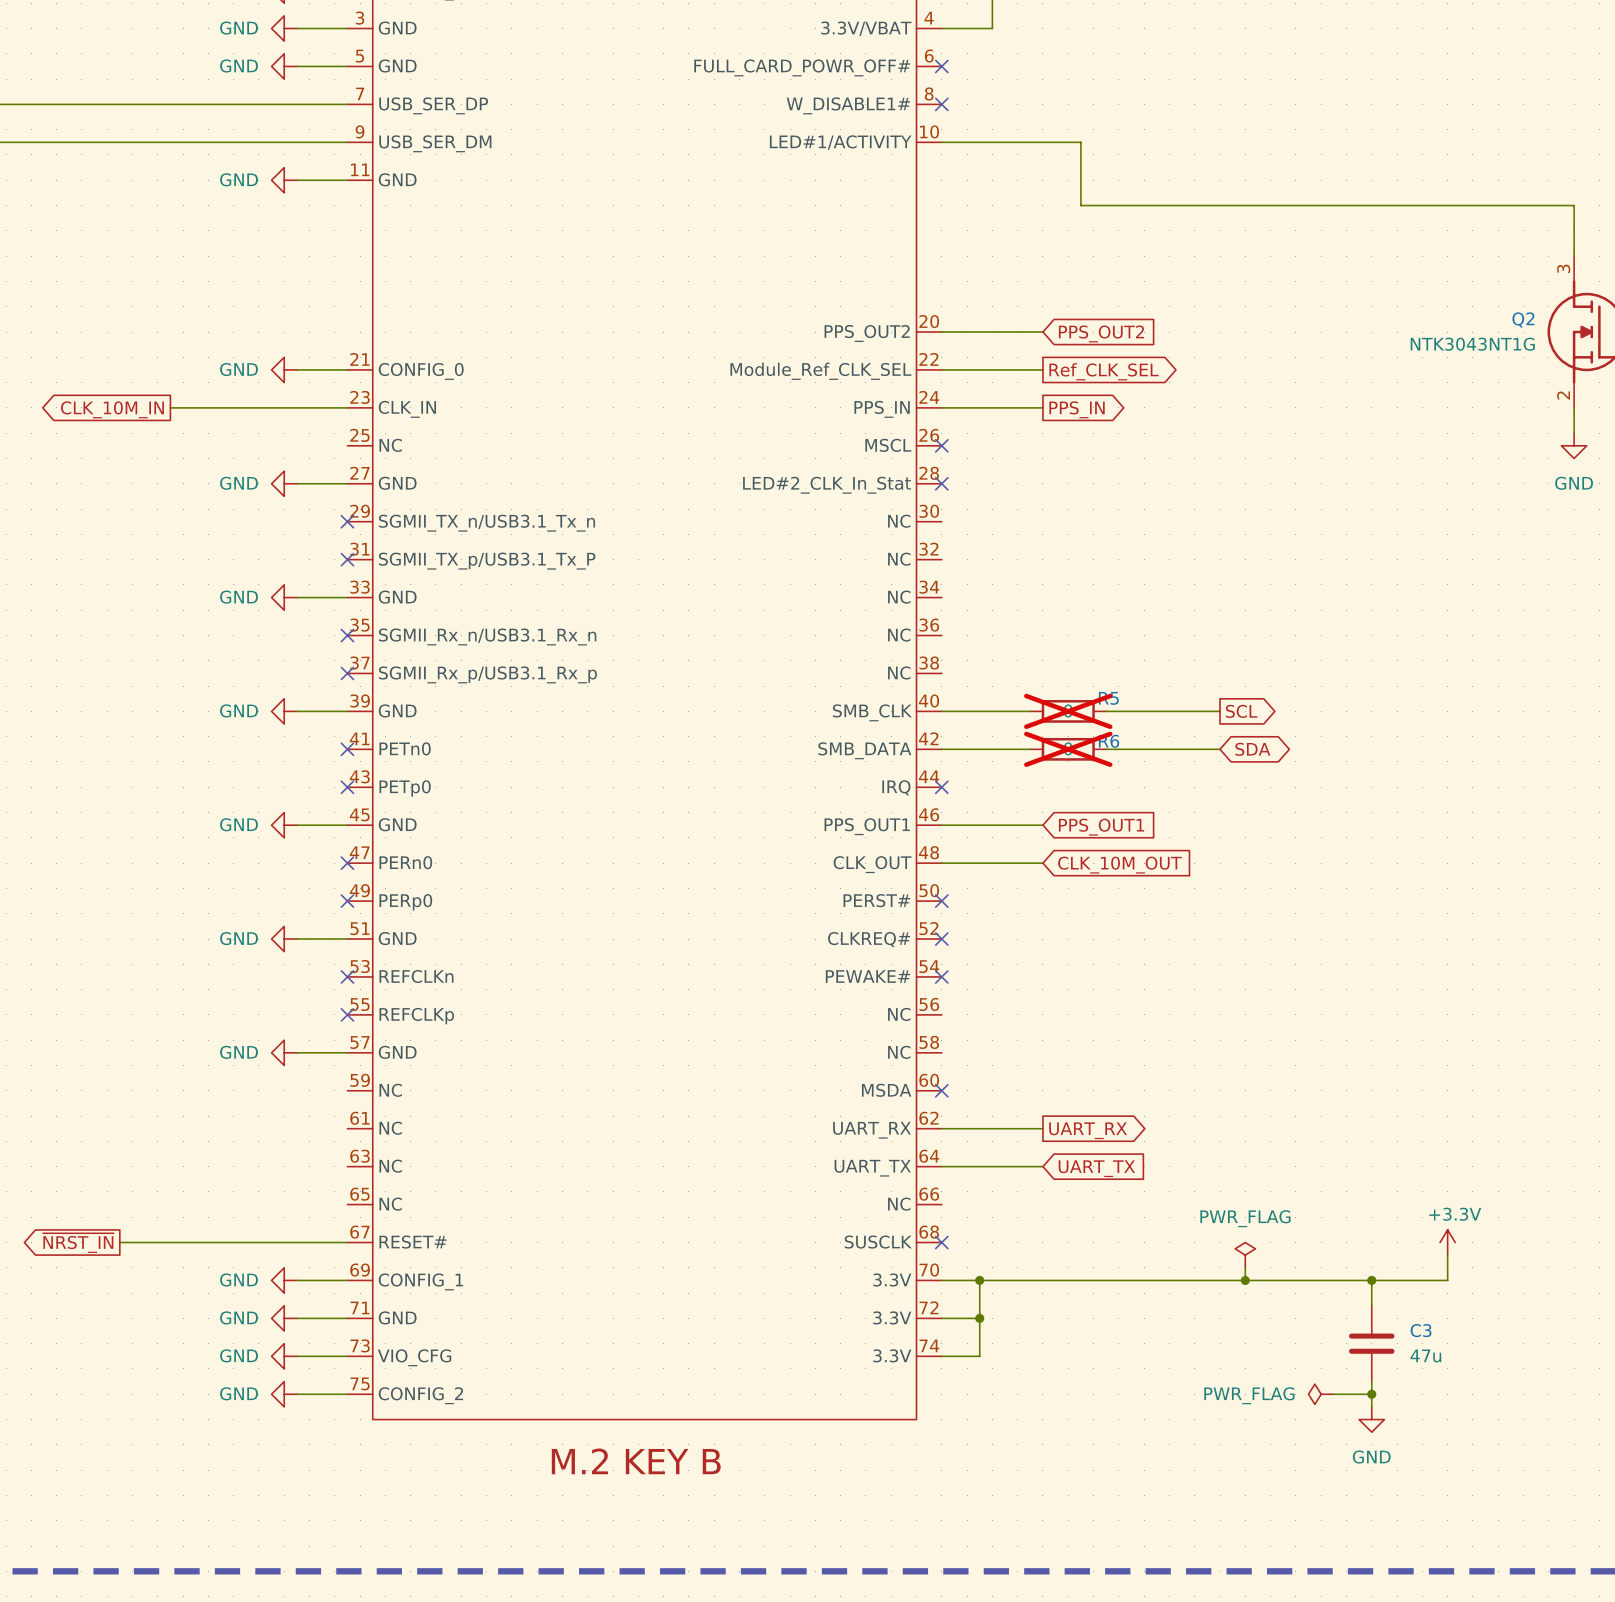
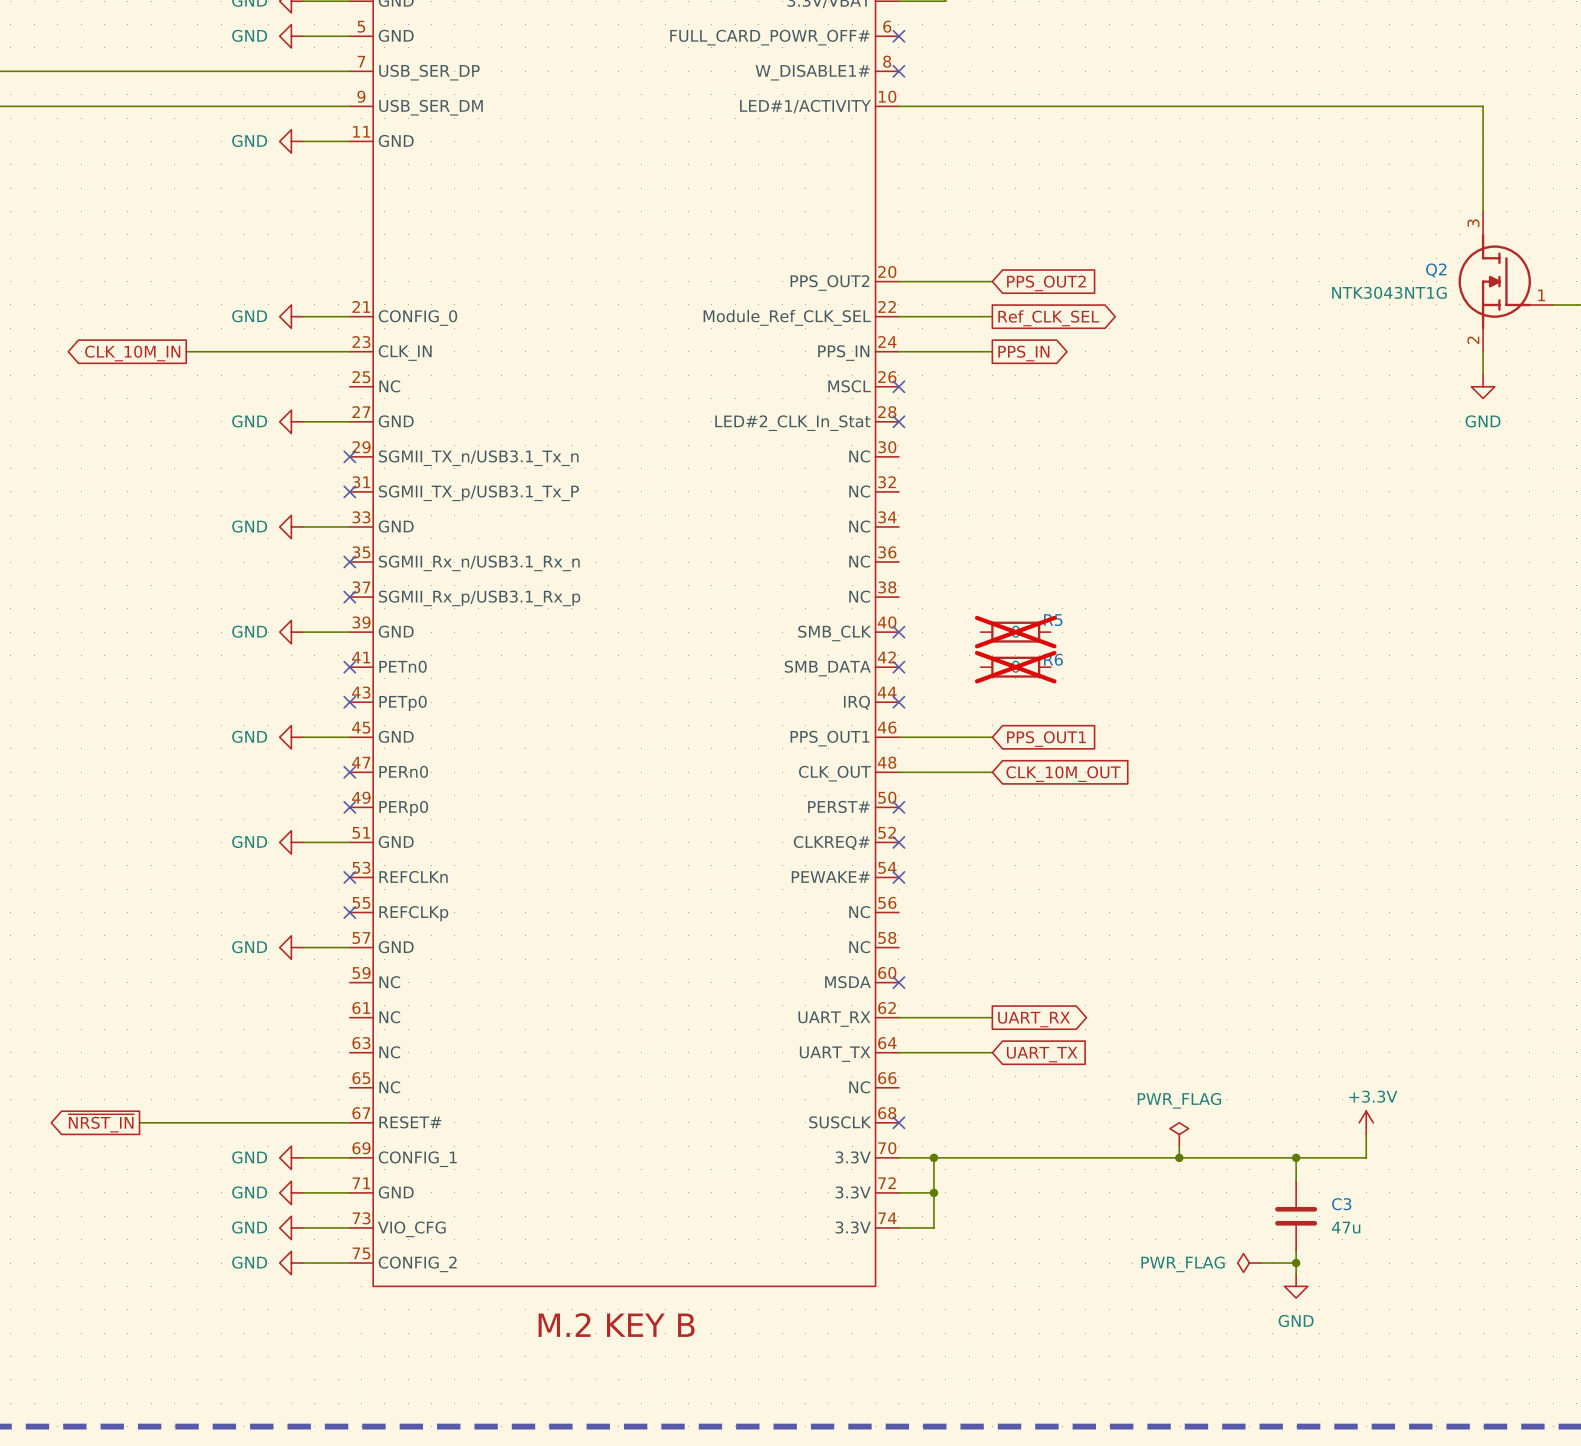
wire: (1080, 142) (1080, 205) (1574, 205) -> (1027, 106) (1483, 106) (1483, 164)
wire: (941, 711) (1030, 711) -> none
no-connect mark: none -> (898, 632)
wire: (1106, 711) (1220, 711) -> none
global label: SCL (1241, 711) -> none
wire: (941, 749) (1030, 749) -> none
no-connect mark: none -> (898, 667)
wire: (1106, 749) (1220, 749) -> none
global label: SDA (1252, 749) -> none

